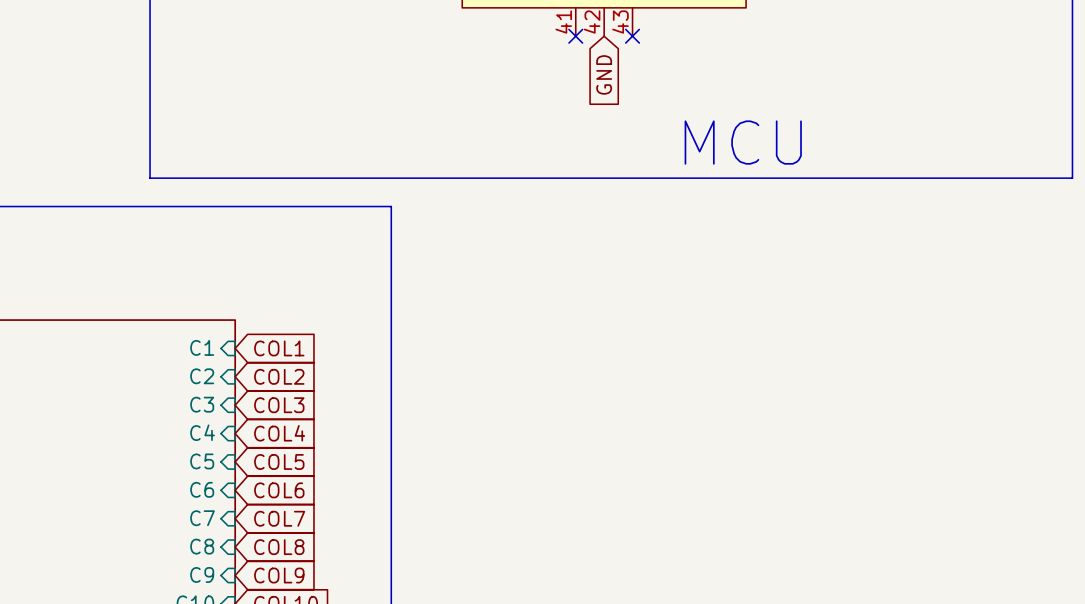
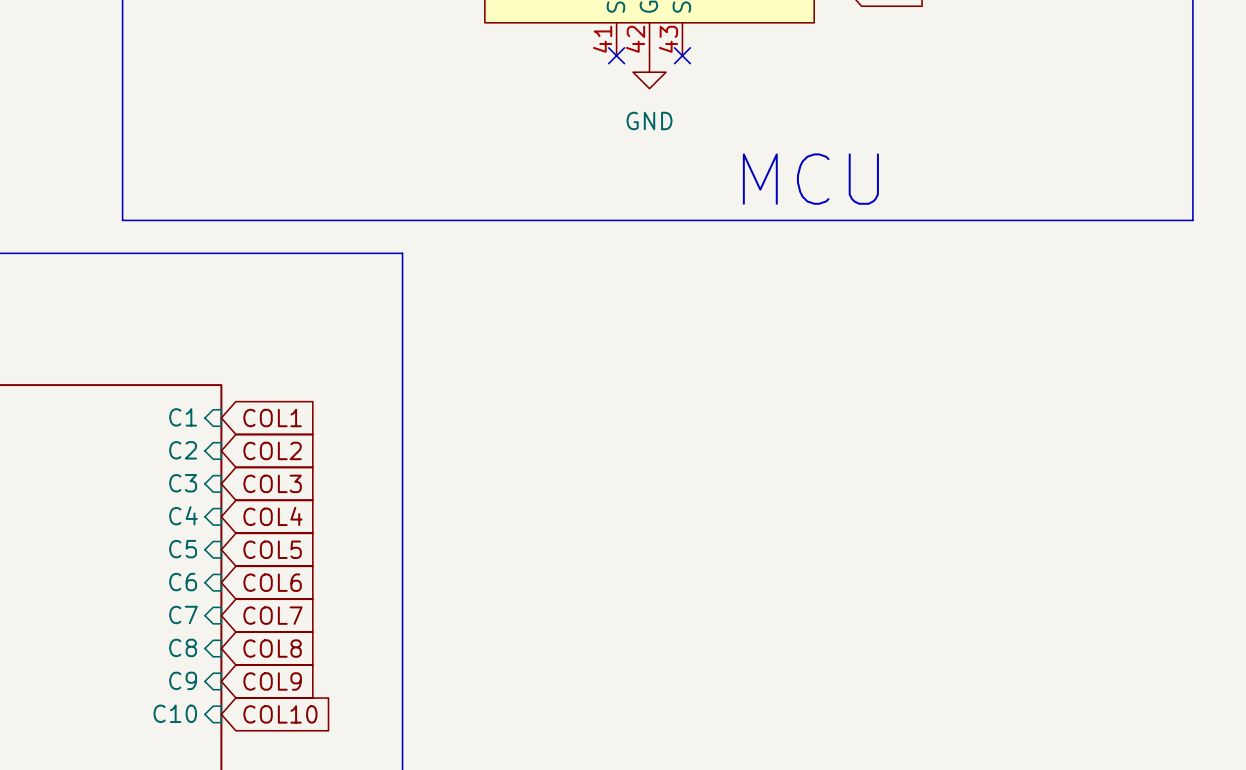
power symbol: none -> GND (649, 72)
global label: GND (604, 74) -> none

